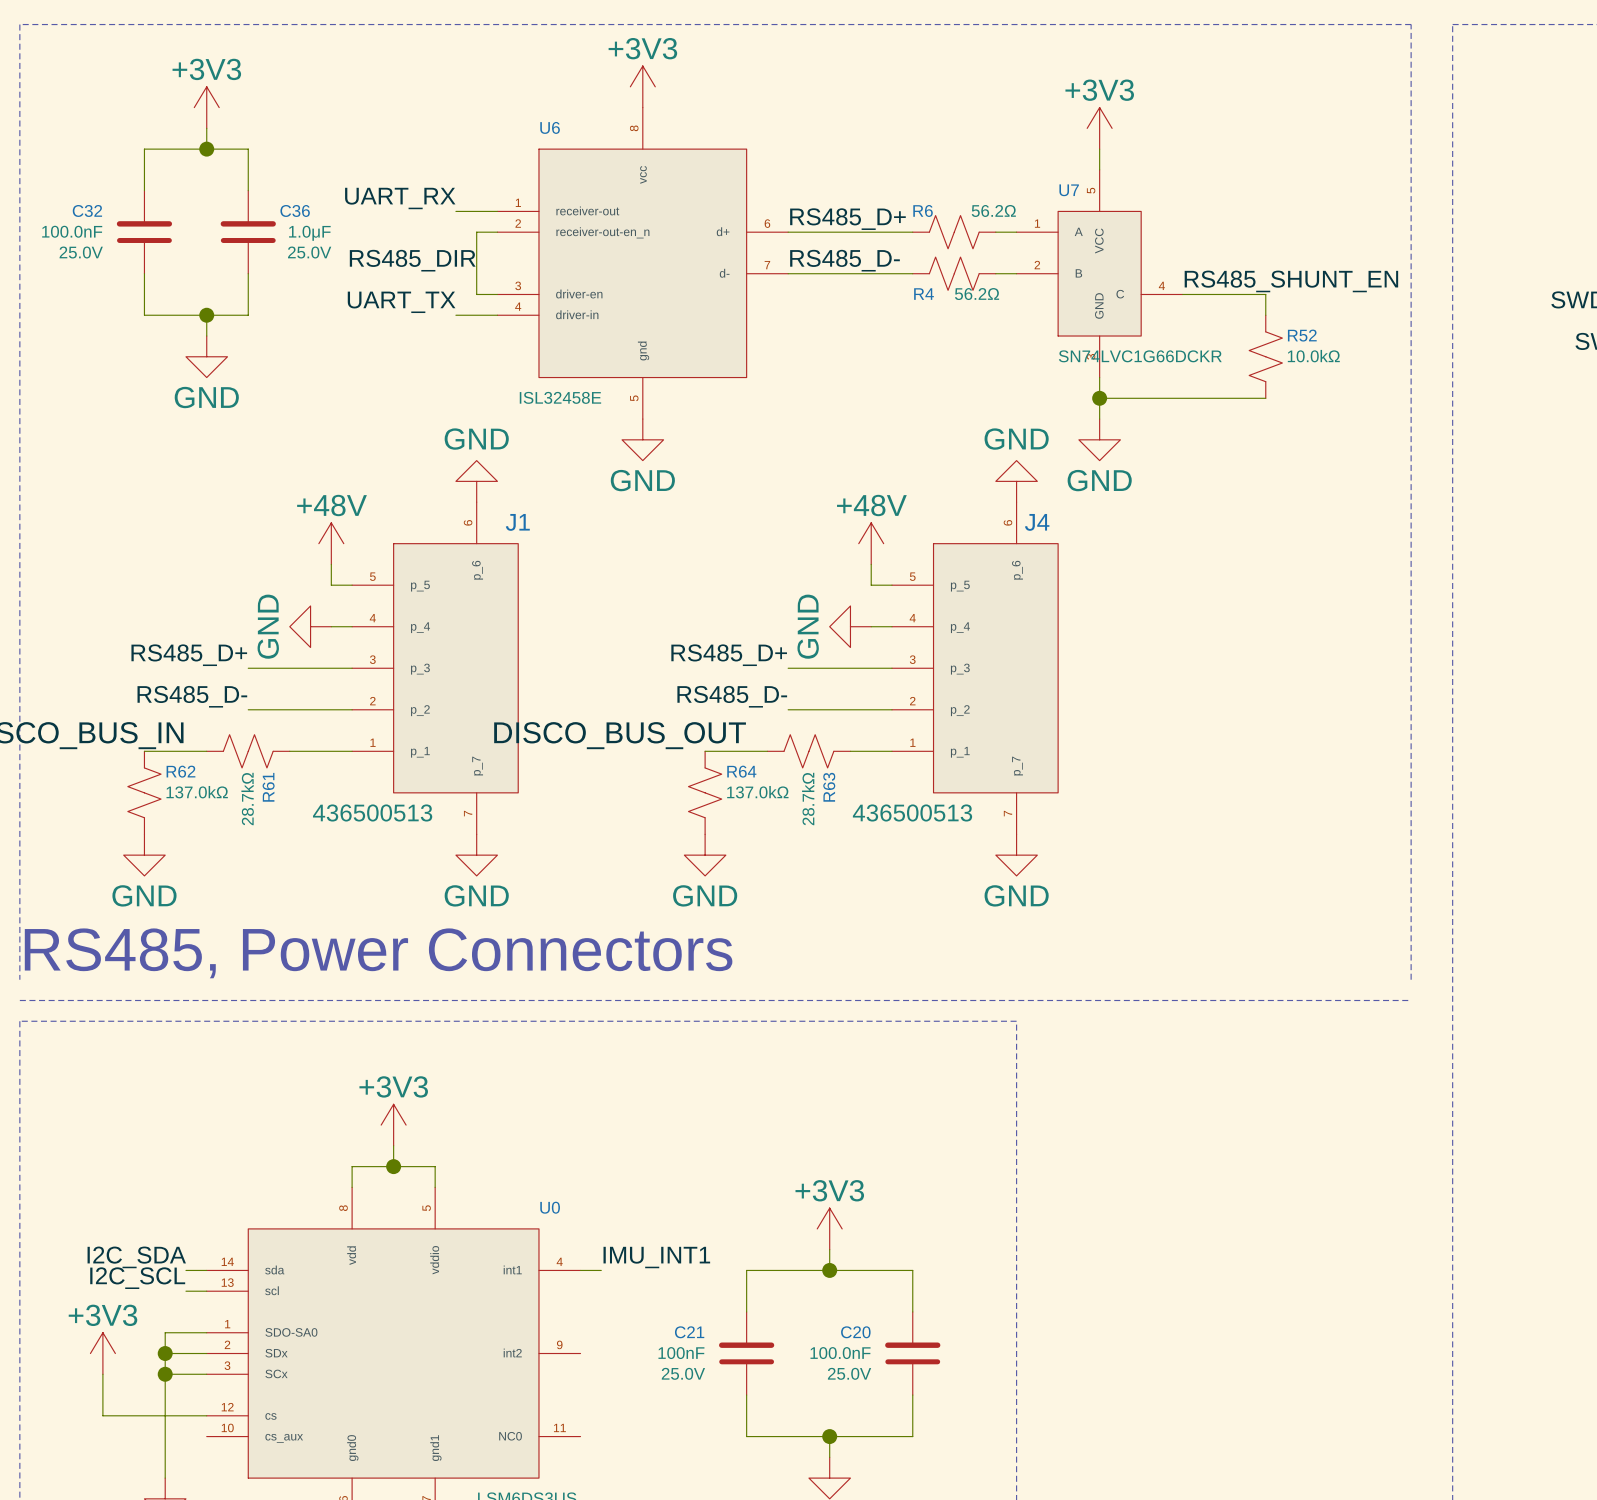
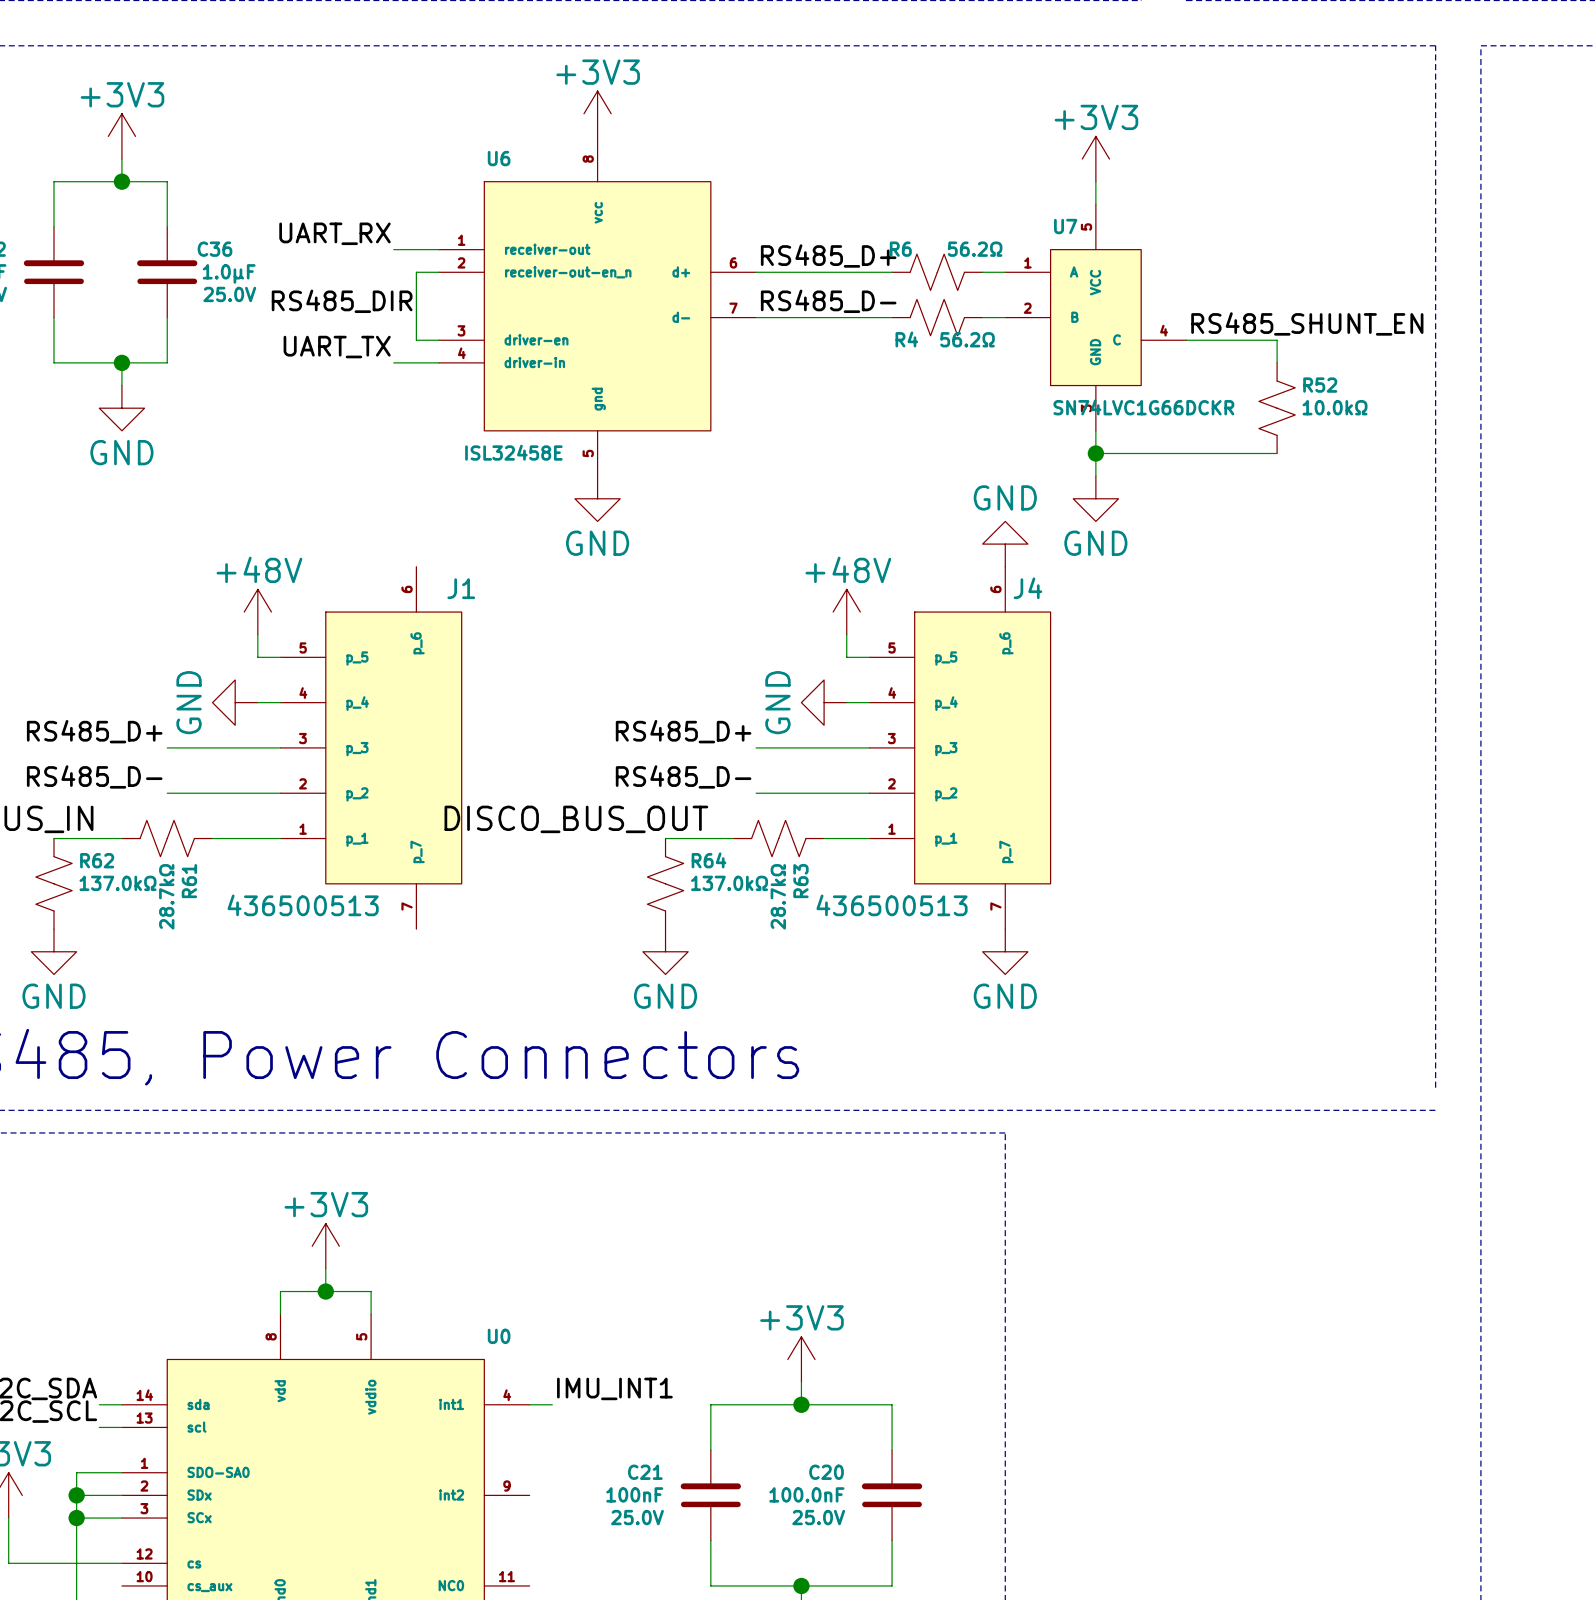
power symbol: GND (476, 481) -> none
power symbol: GND (476, 855) -> none

